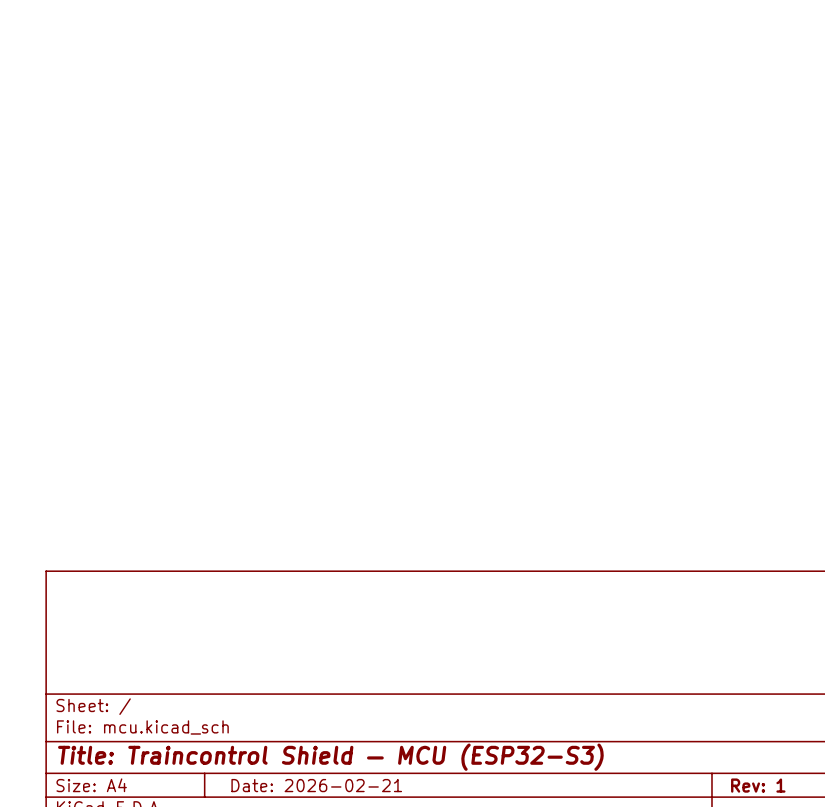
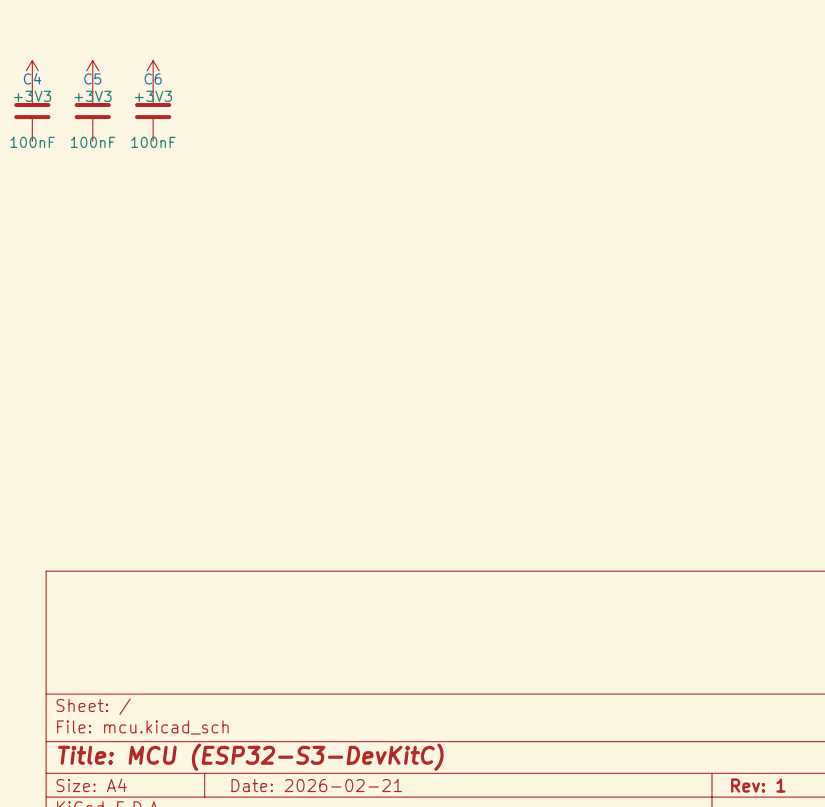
power symbol: none -> +3V3 (32, 70)
power symbol: none -> +3V3 (92, 70)
power symbol: none -> +3V3 (153, 70)
C4: none -> 100nF (32, 111)
C5: none -> 100nF (92, 111)
C6: none -> 100nF (153, 111)
title block: Title: Traincontrol Shield — MCU (ESP32-S3) (330, 757) -> Title: MCU (ESP32-S3-DevKitC) (250, 757)

